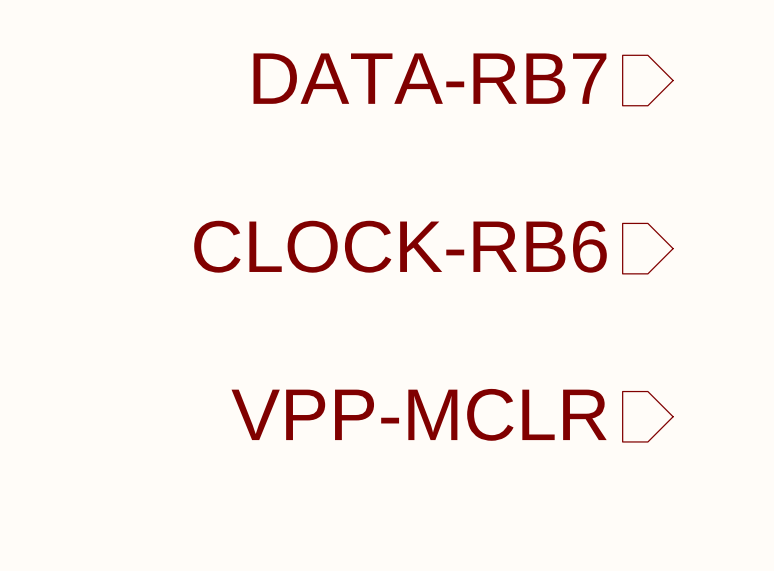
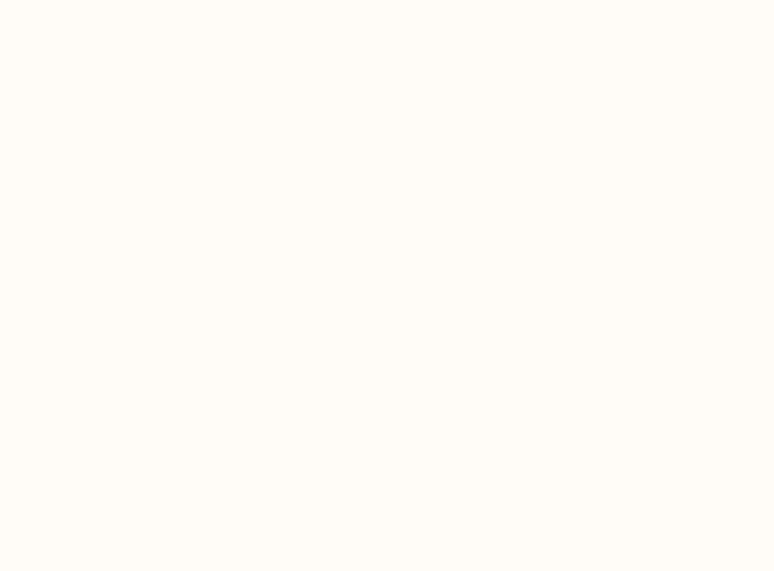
hierarchical label: DATA-RB7 (429, 78) -> none
hierarchical label: CLOCK-RB6 (400, 246) -> none
hierarchical label: VPP-MCLR (419, 414) -> none

